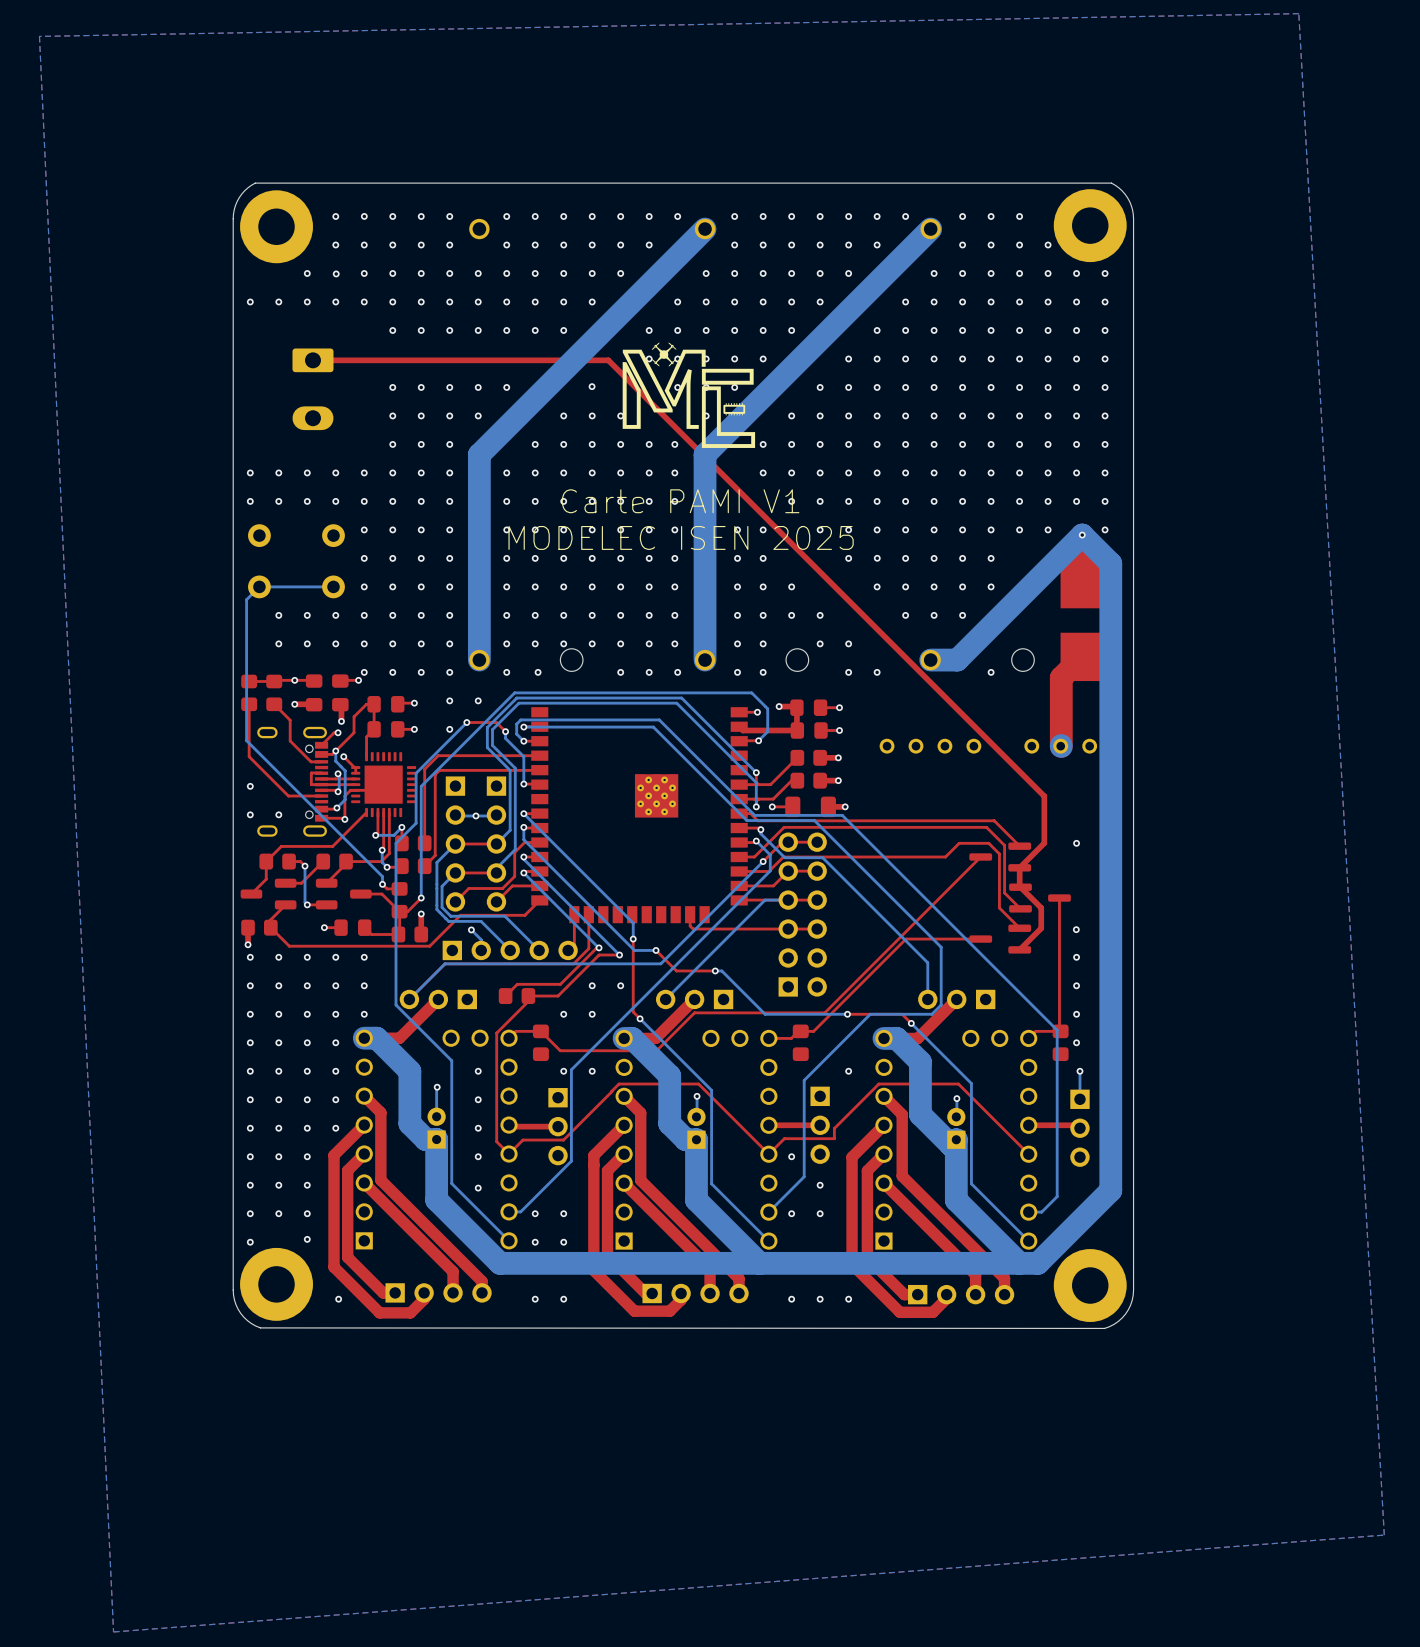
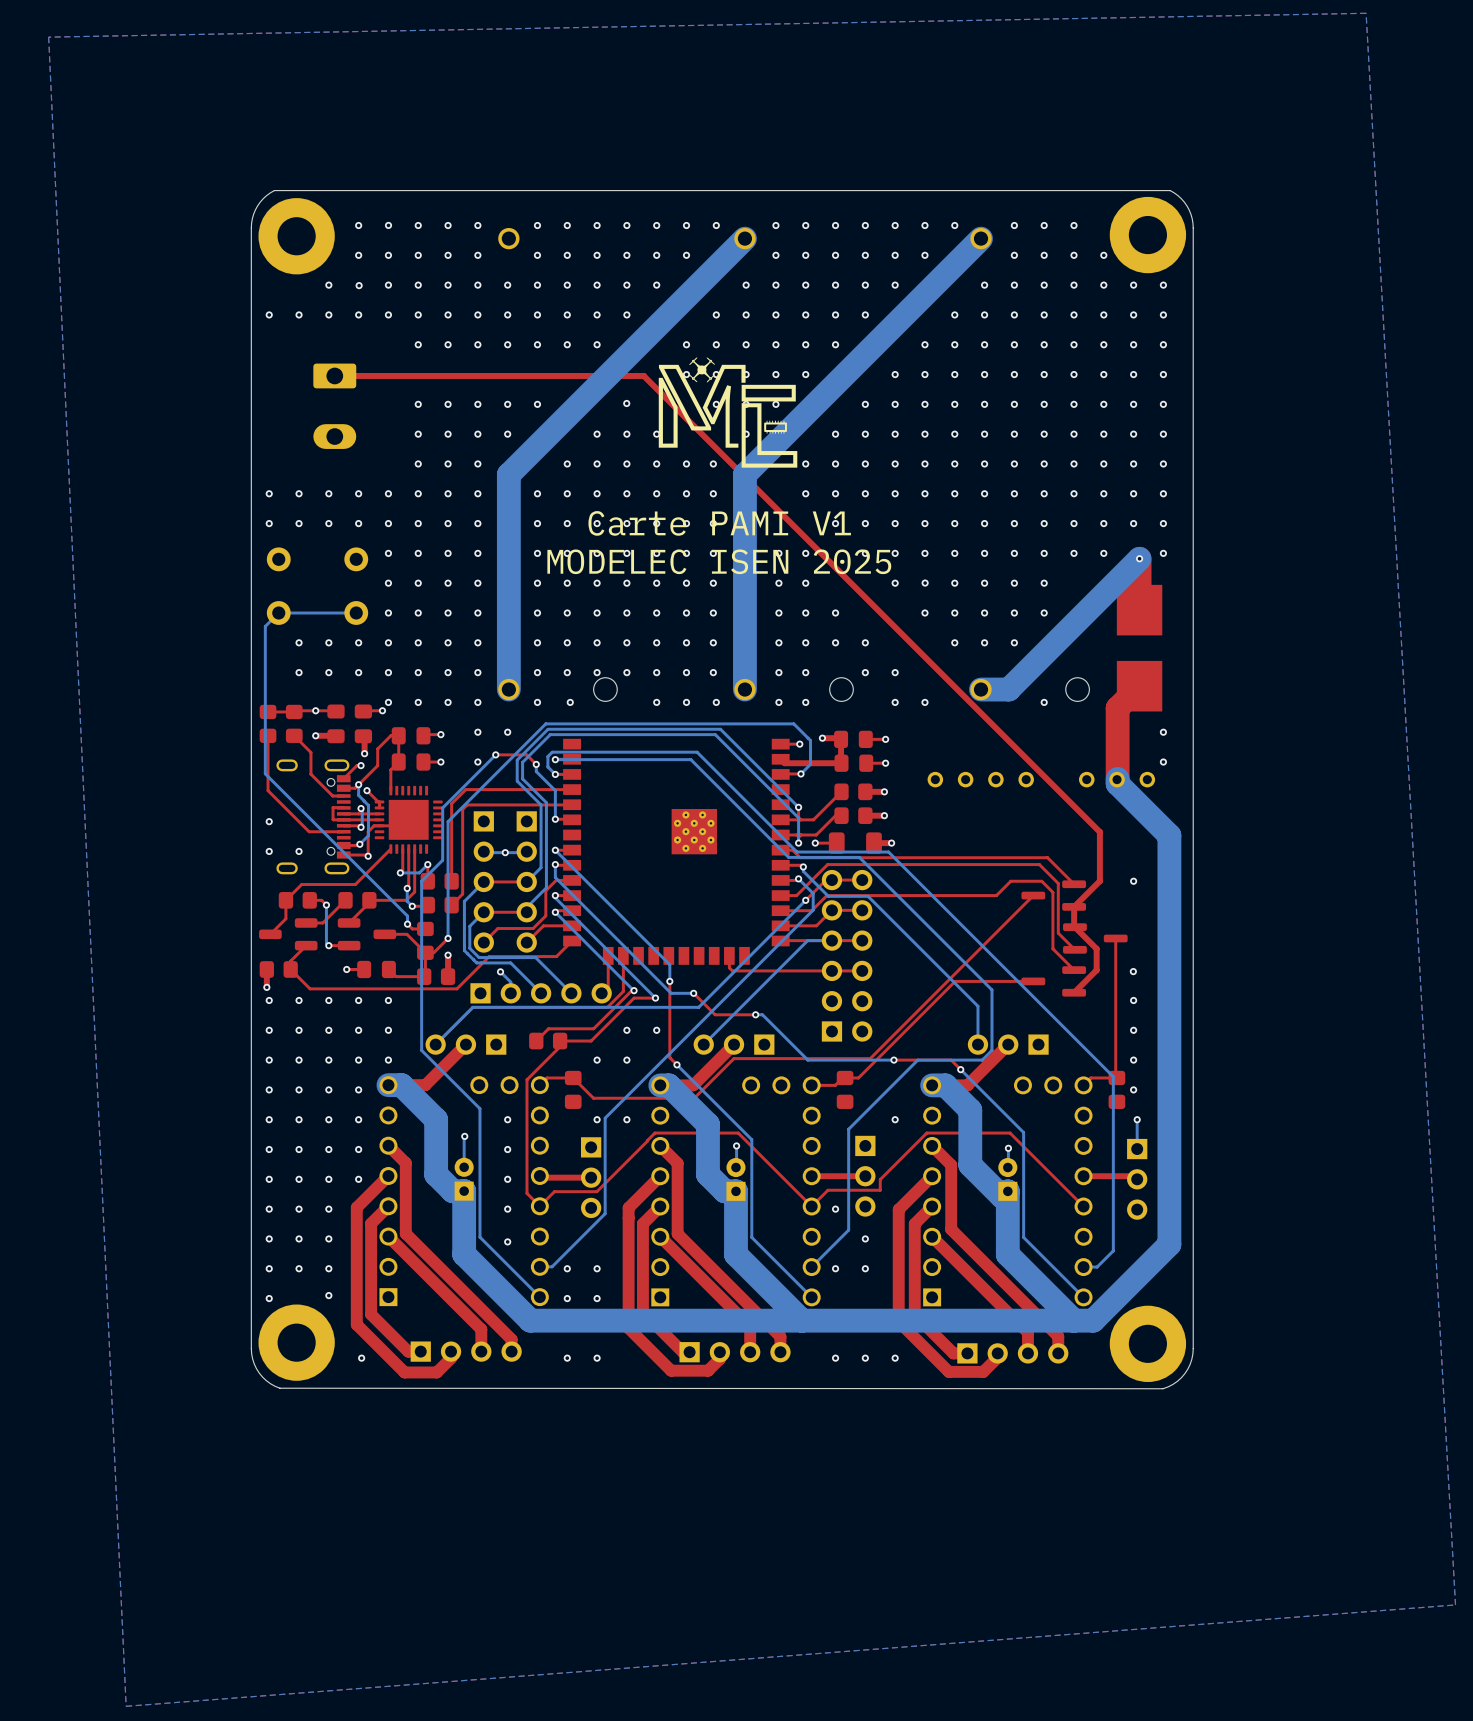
bottom track: (1082, 535) (1110, 563) (1110, 799) -> (1117, 779) (1117, 783) (1169, 835)
via: none -> (1163, 732)
via: none -> (1163, 762)

